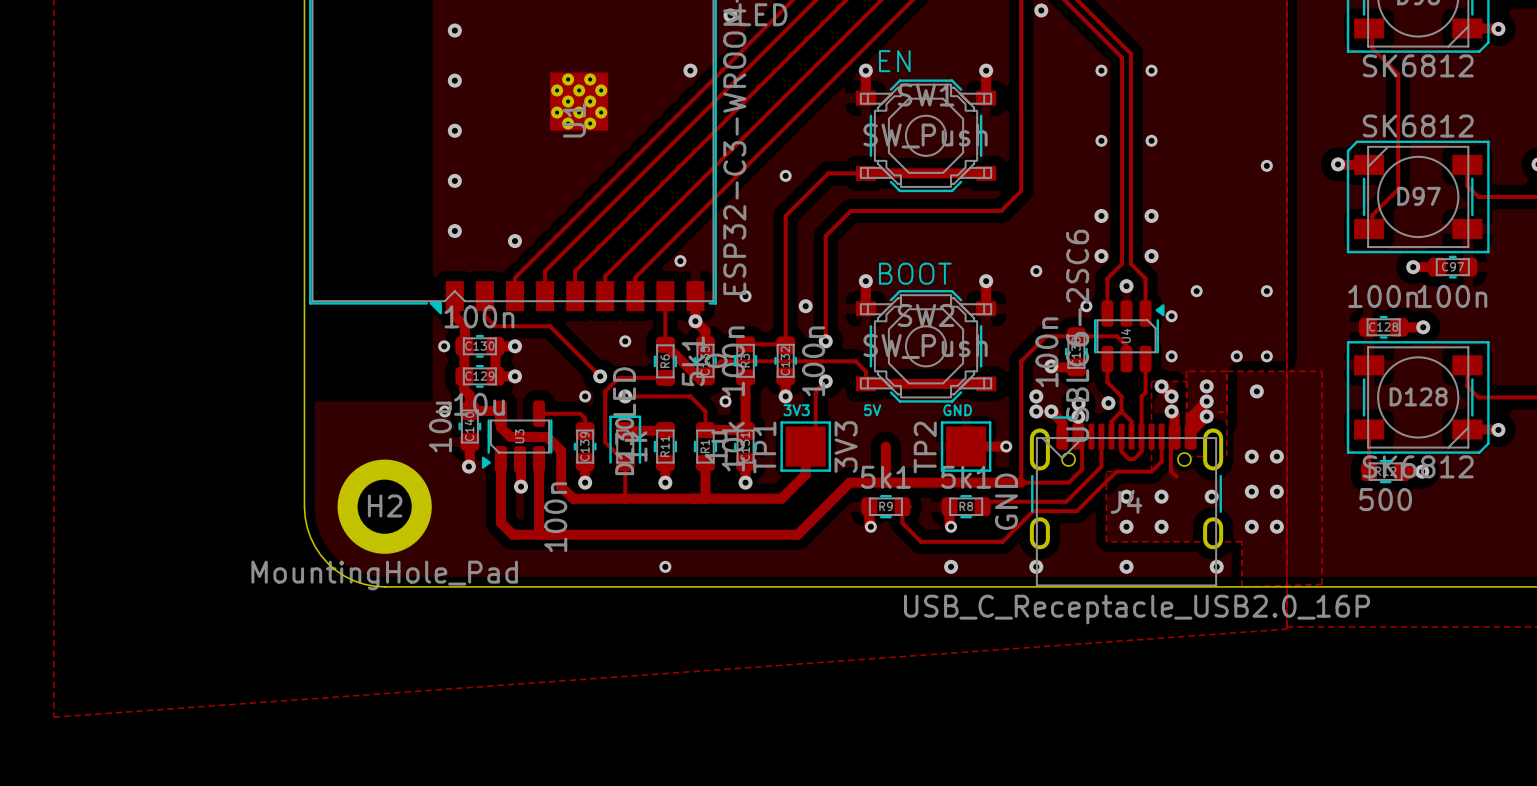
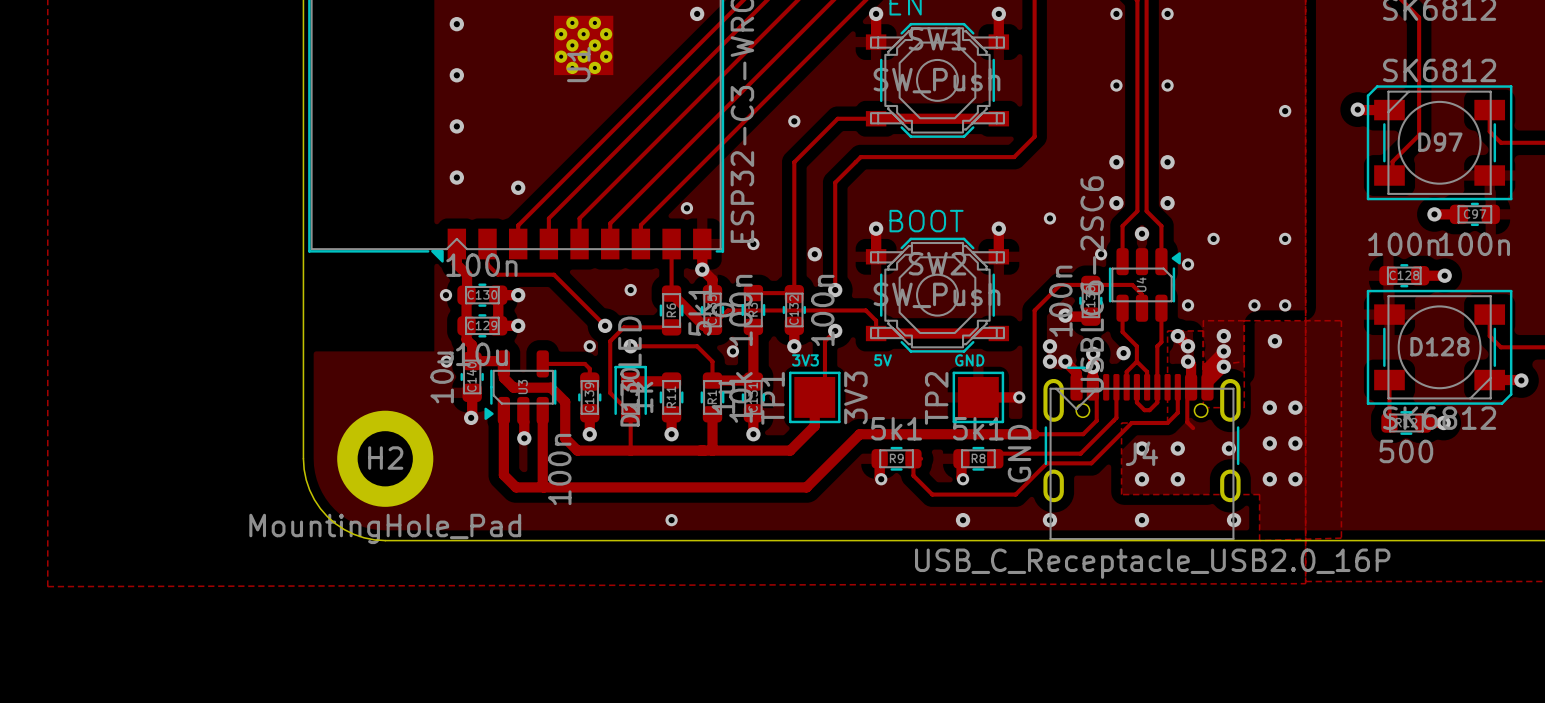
track: (885, 446) (885, 482) -> none
zone outline: (1286, 629) (53, 717) (53, 632) -> (1305, 583) (47, 586)

